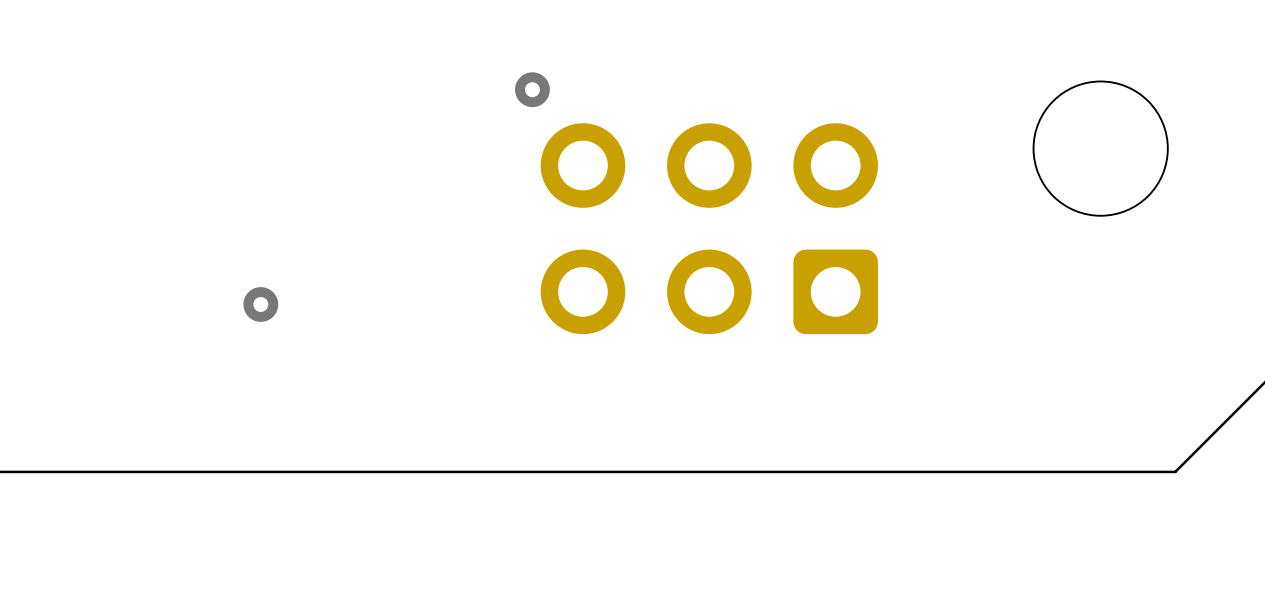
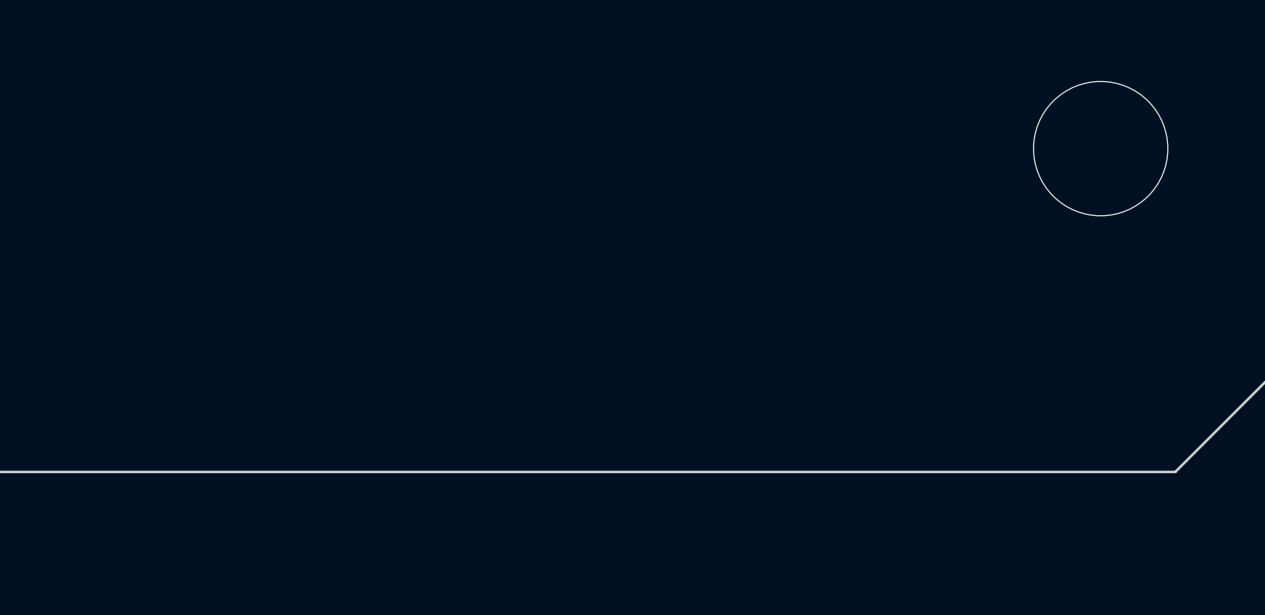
via: (532, 89) -> none
part: (709, 228) -> none
via: (260, 304) -> none

